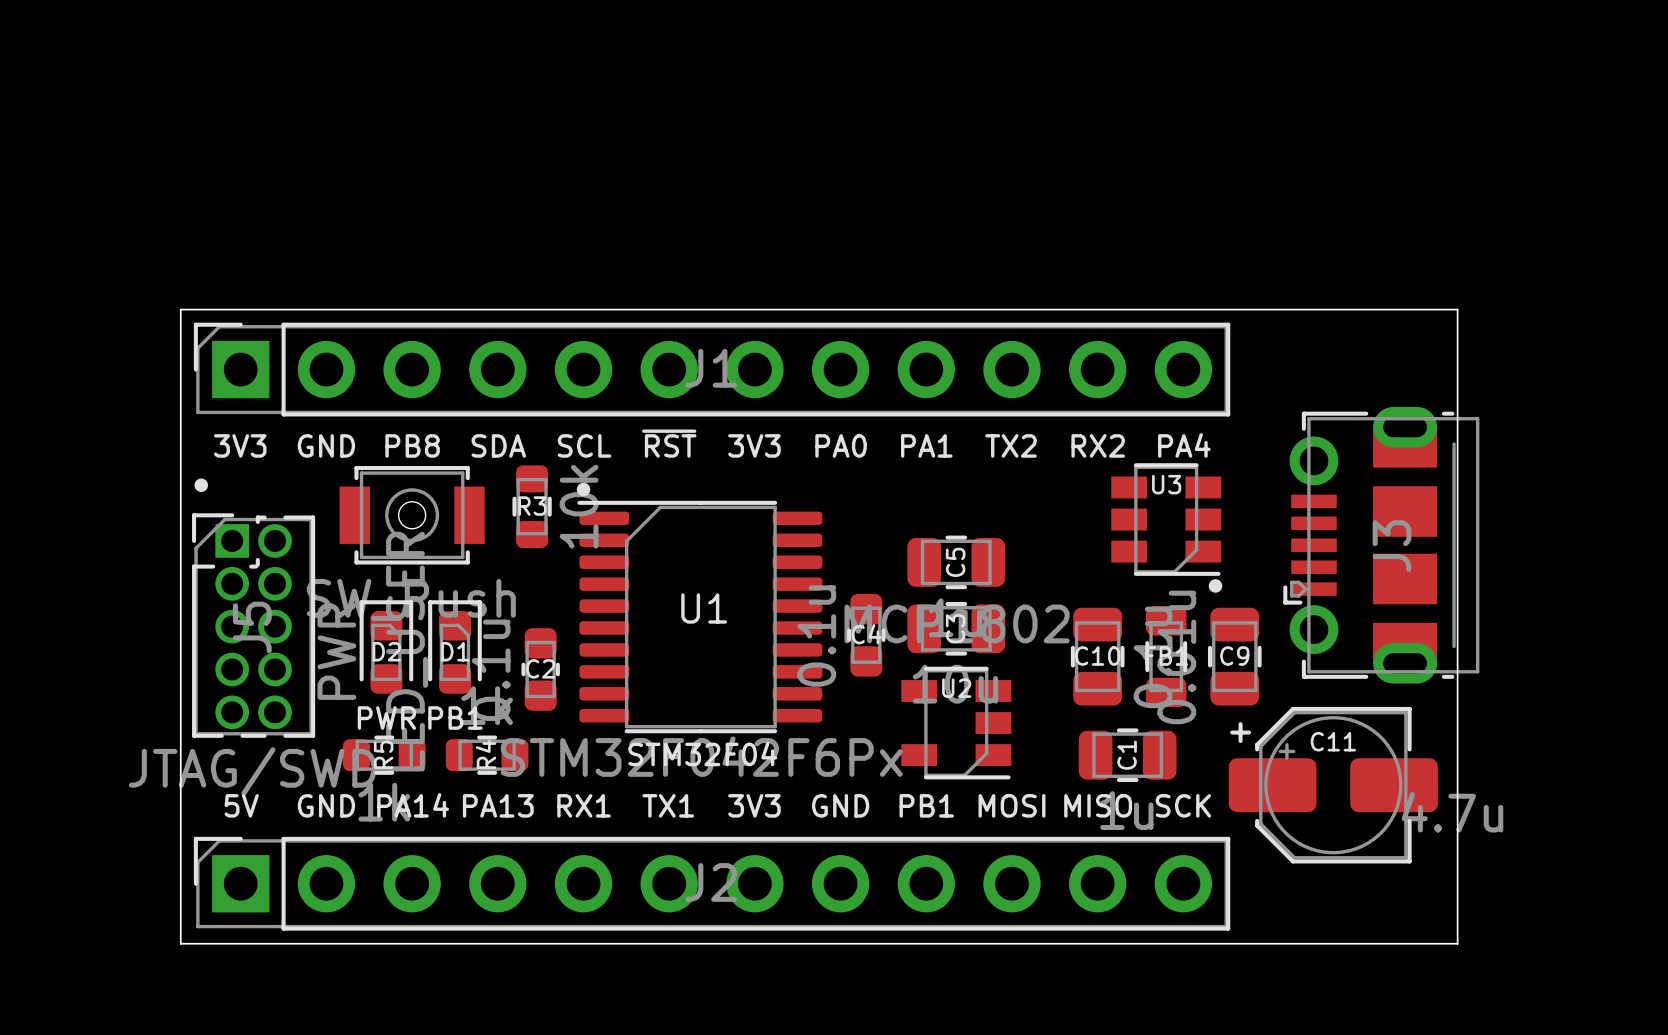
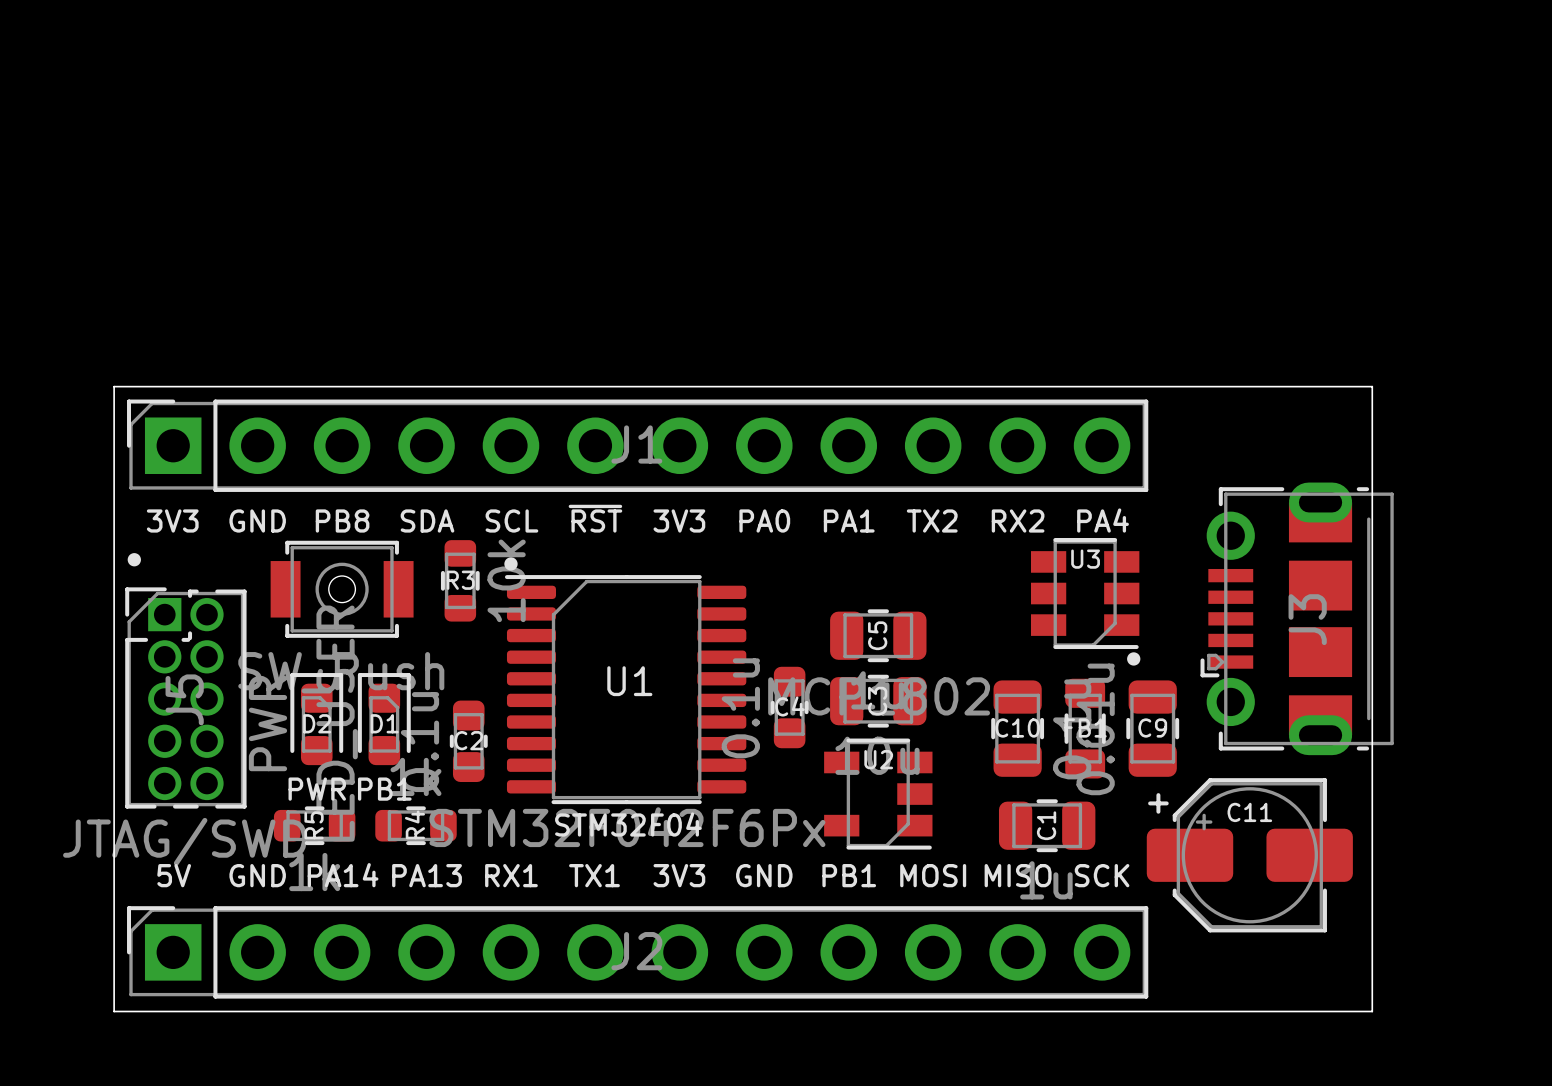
C11 value: 4.7u (1452, 812) -> none

